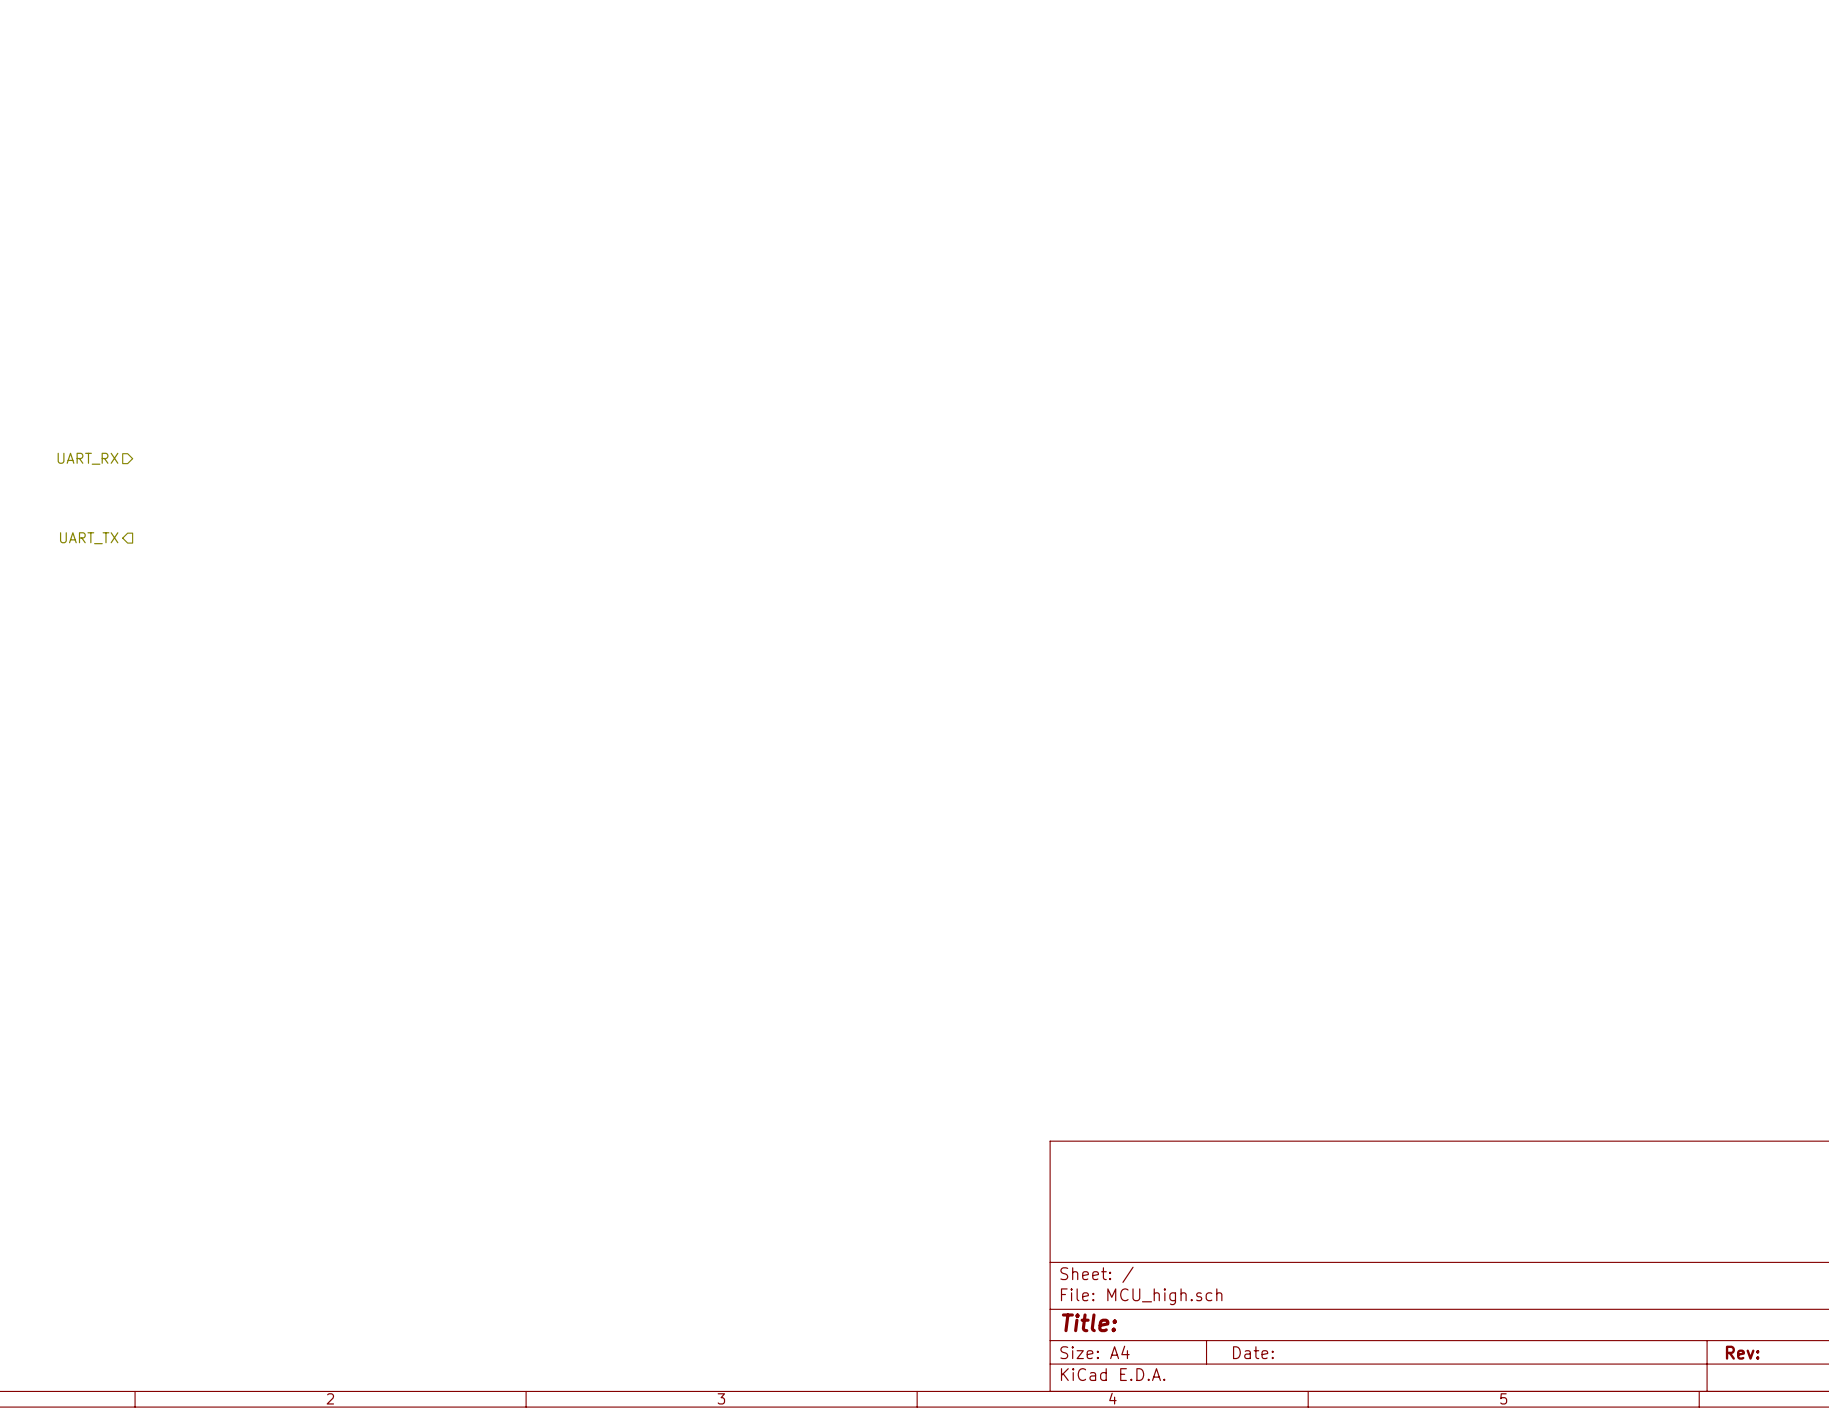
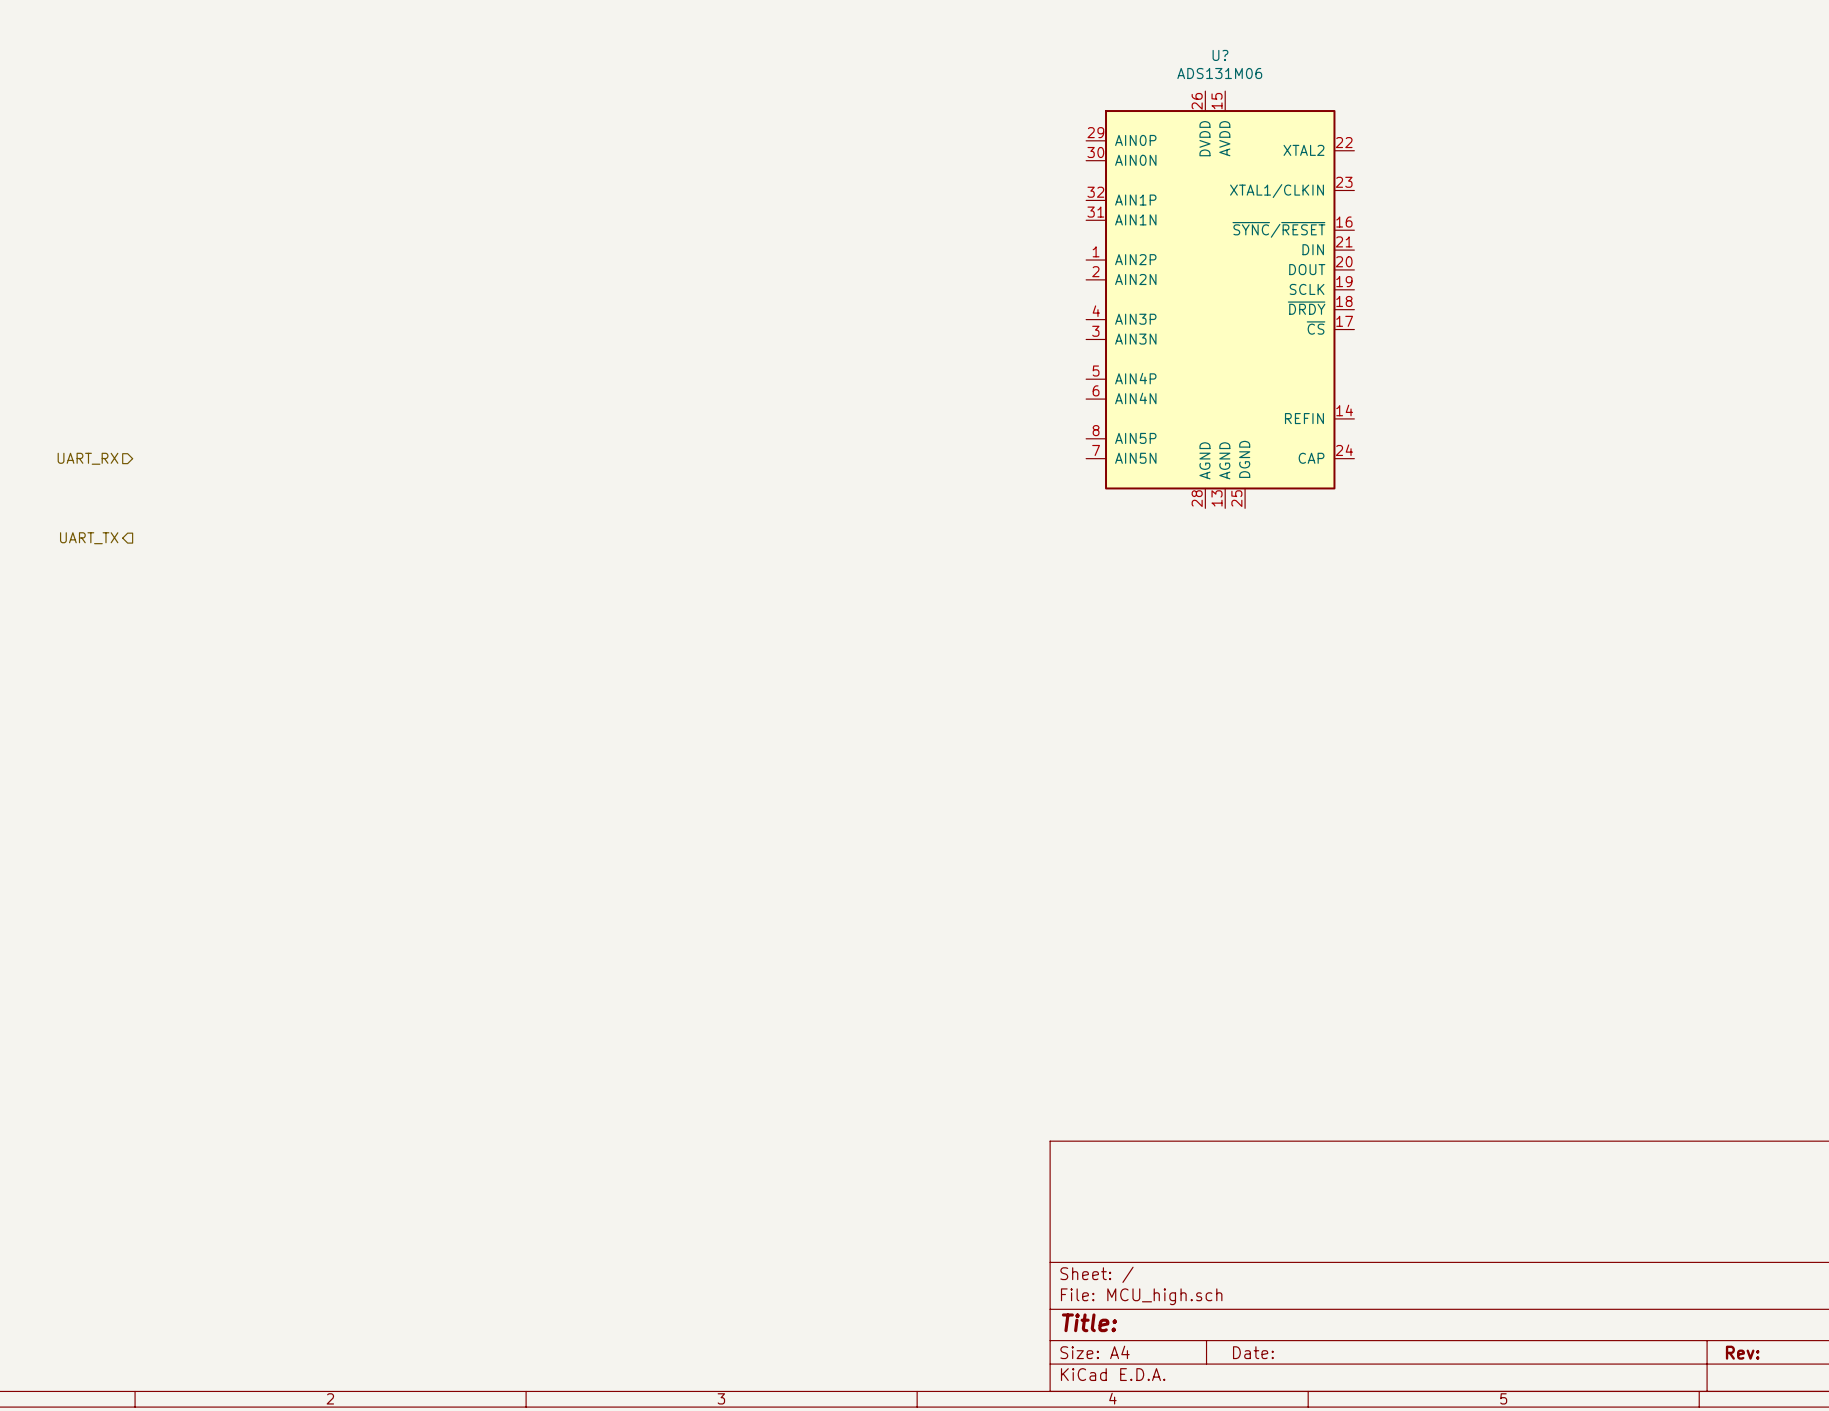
U?: none -> ADS131M06 (1220, 299)

